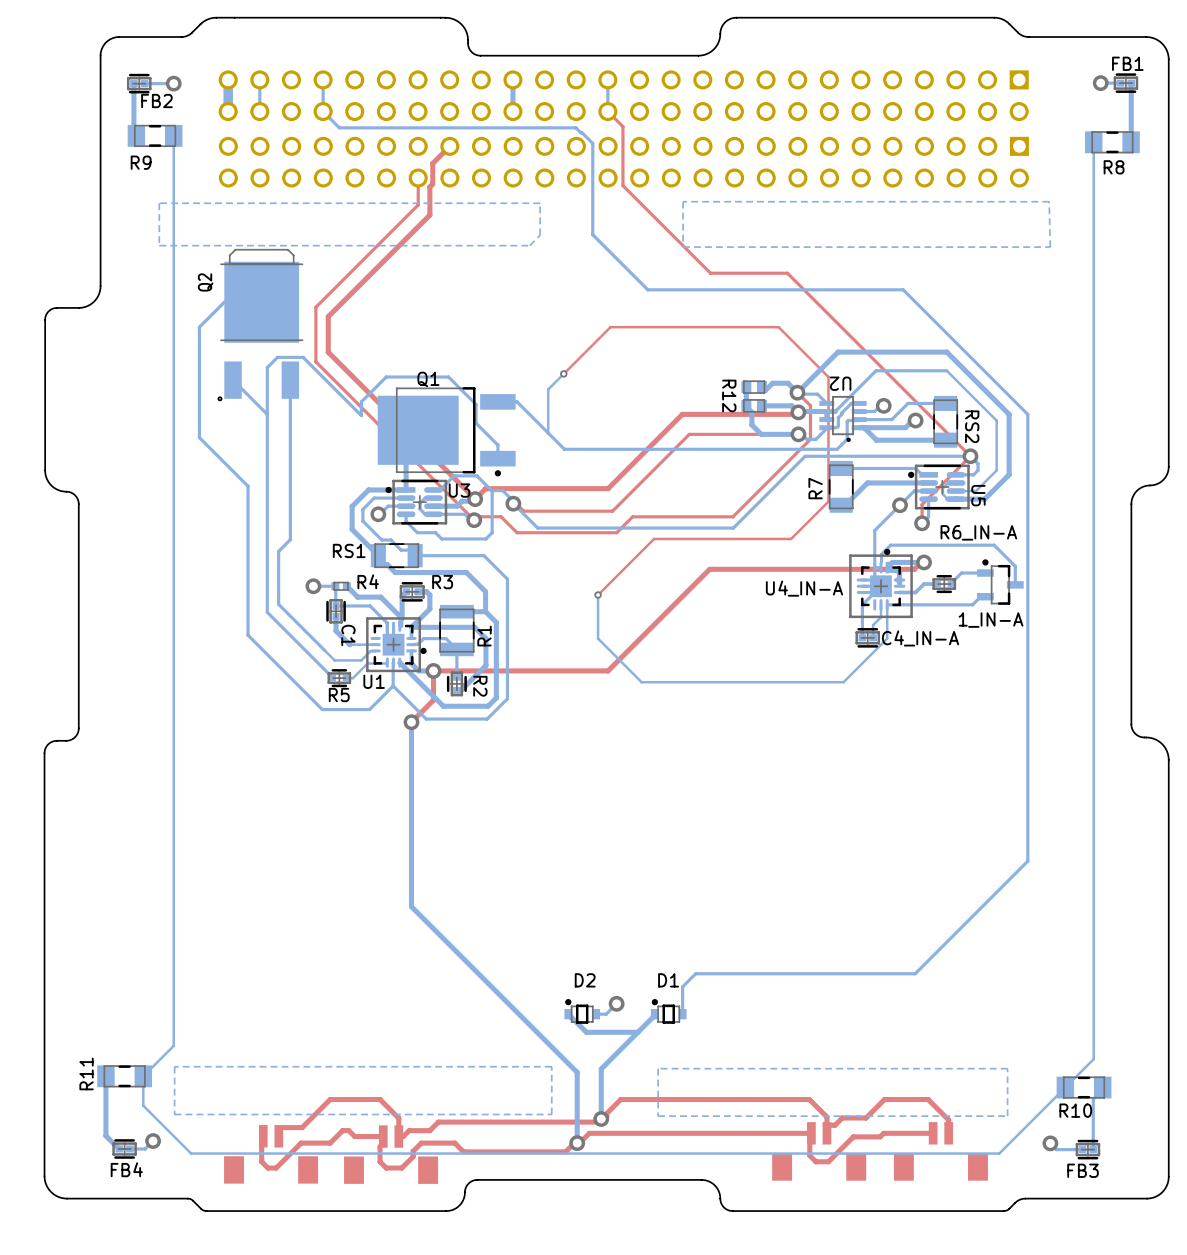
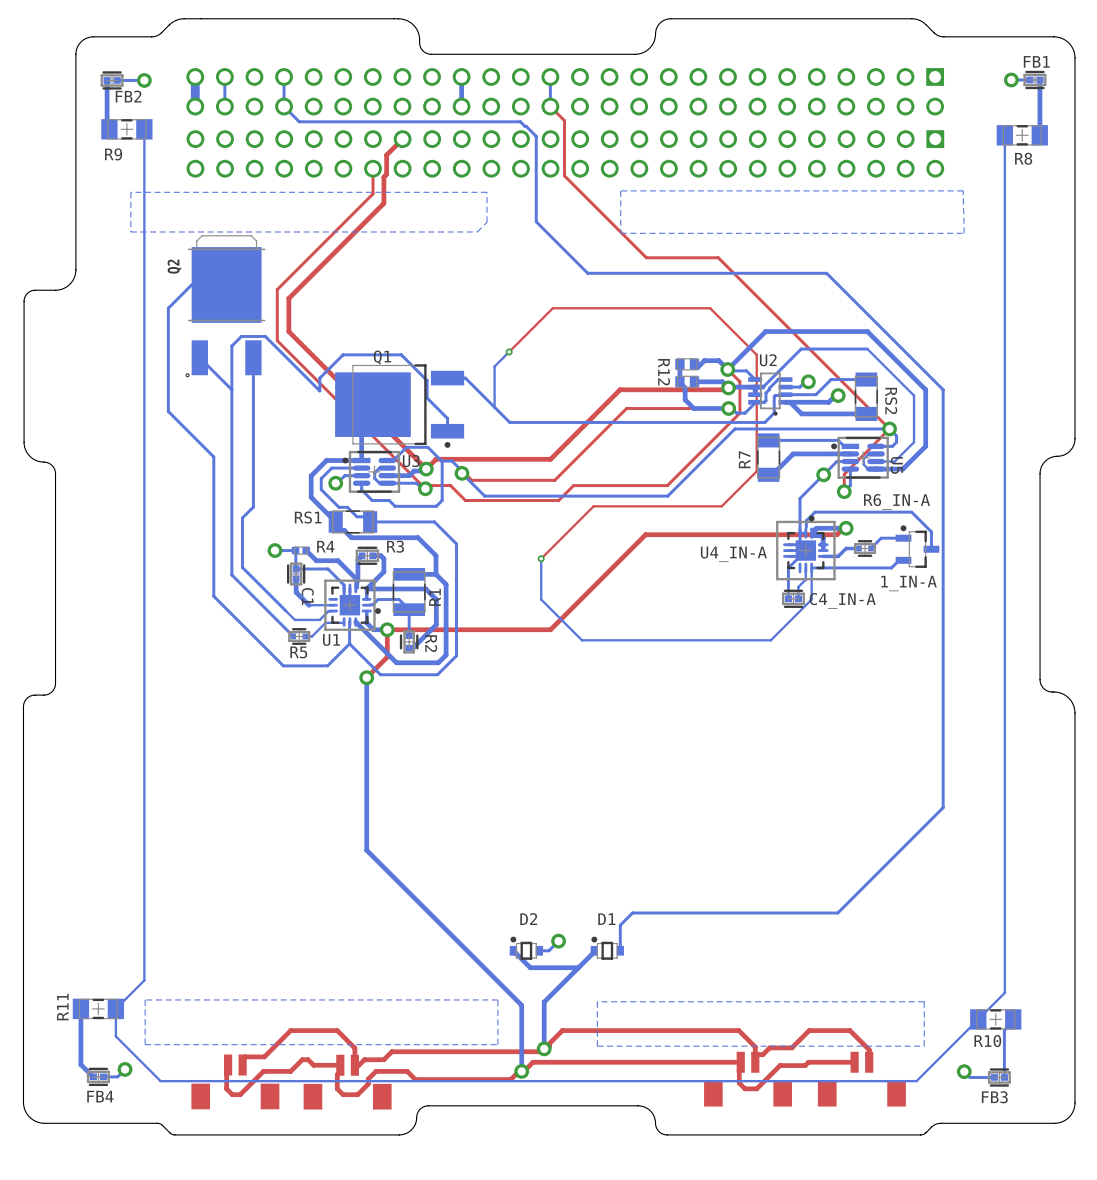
R9 footprint: [127, 125, 183, 147] -> [101, 119, 153, 140]
R8 footprint: [1085, 131, 1140, 154] -> [996, 125, 1048, 146]
U2 name rotation: 0° (840, 383) -> 180° (768, 360)
R11 footprint: [97, 1065, 153, 1088] -> [72, 998, 125, 1020]
R10 footprint: [1056, 1076, 1112, 1099] -> [970, 1009, 1022, 1030]

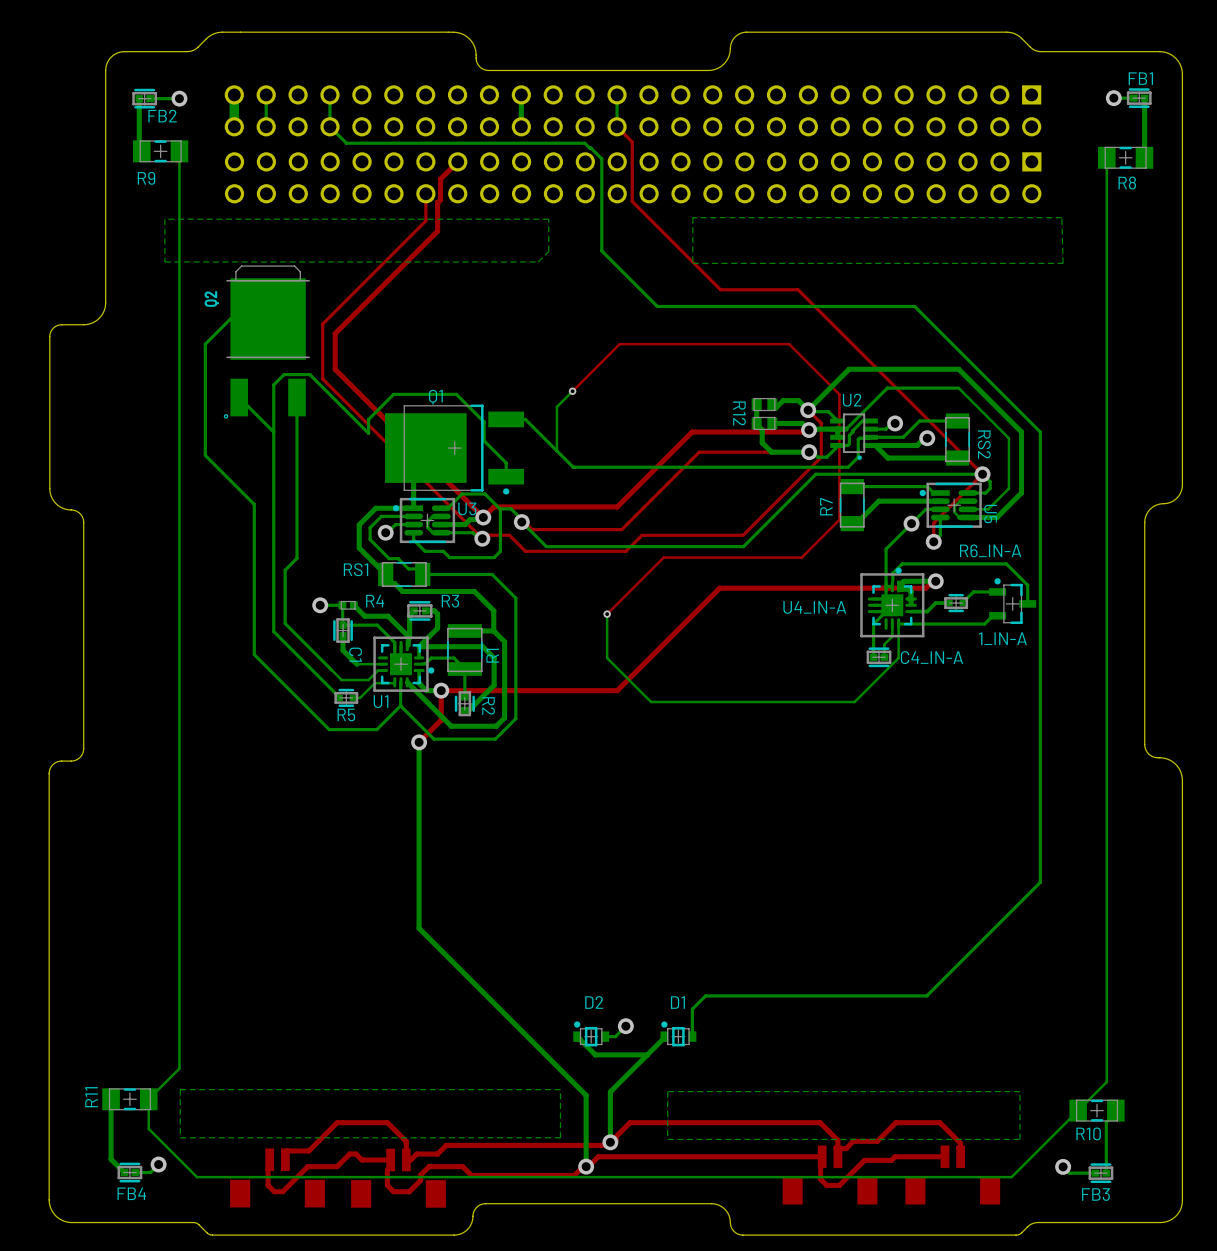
Q1 footprint: [335, 364, 465, 448] -> [385, 404, 525, 495]
1_IN-A footprint: [895, 525, 940, 568] -> [989, 578, 1037, 624]
D2 footprint: [509, 936, 544, 960] -> [573, 1021, 610, 1047]
D1 footprint: [590, 936, 624, 960] -> [660, 1021, 697, 1047]

